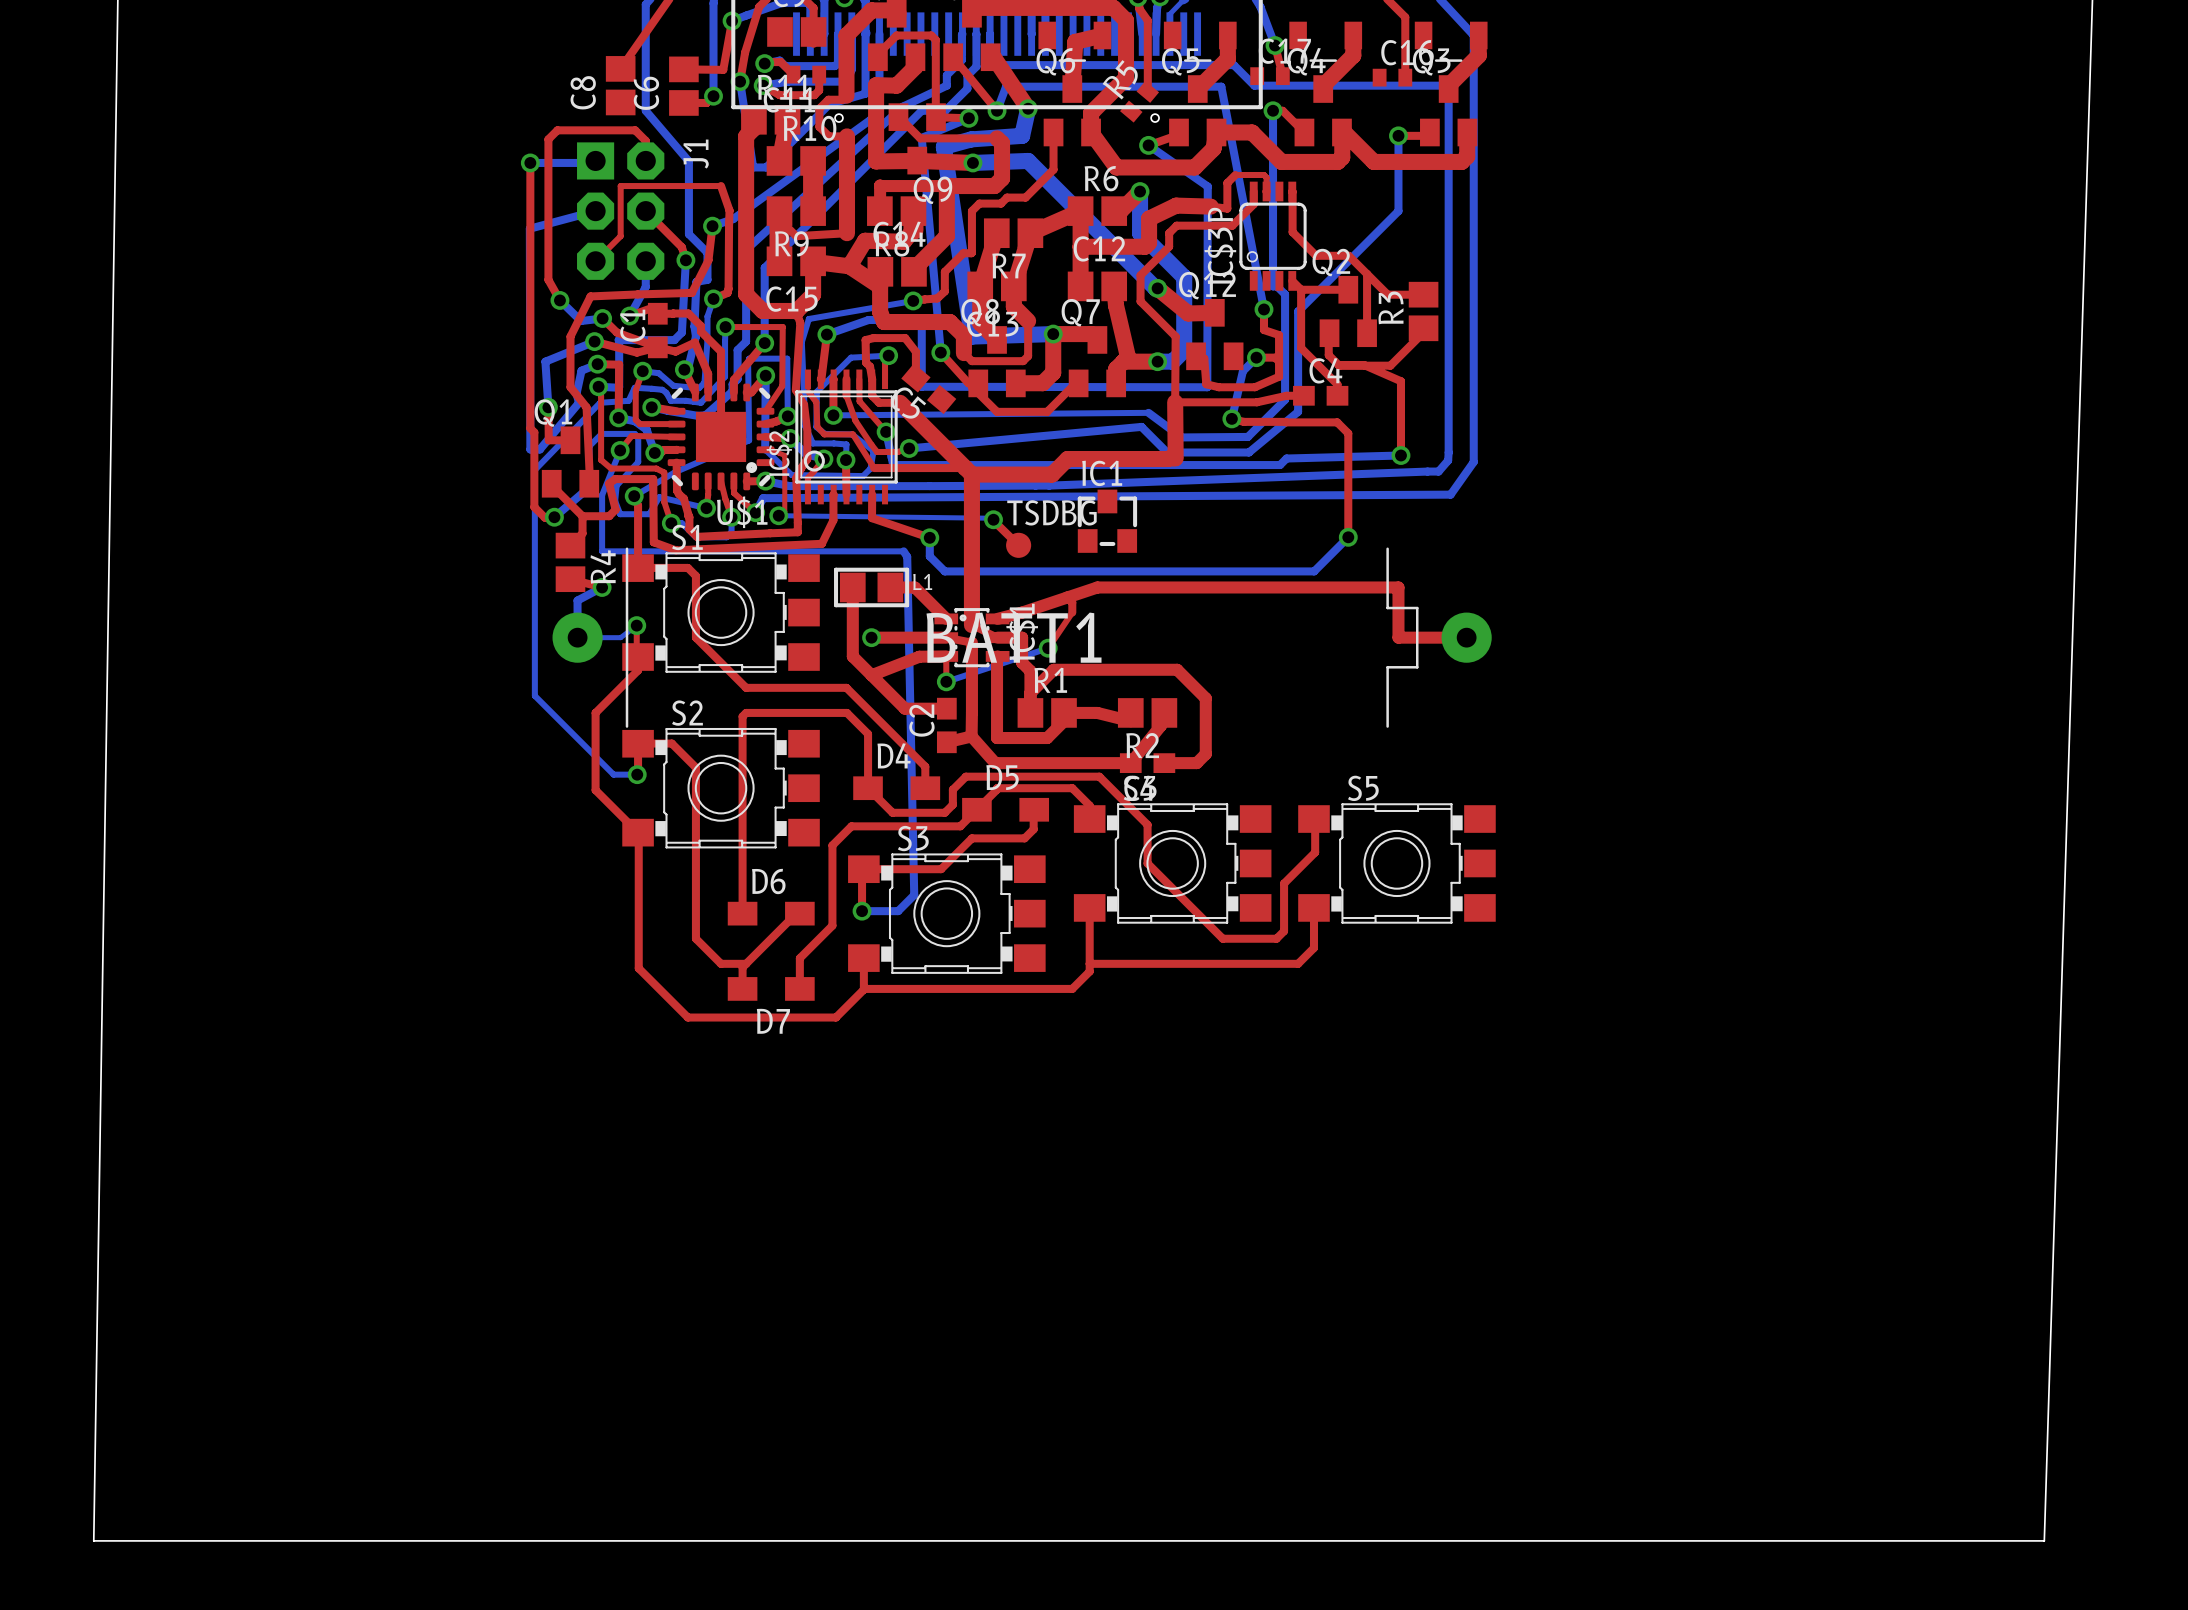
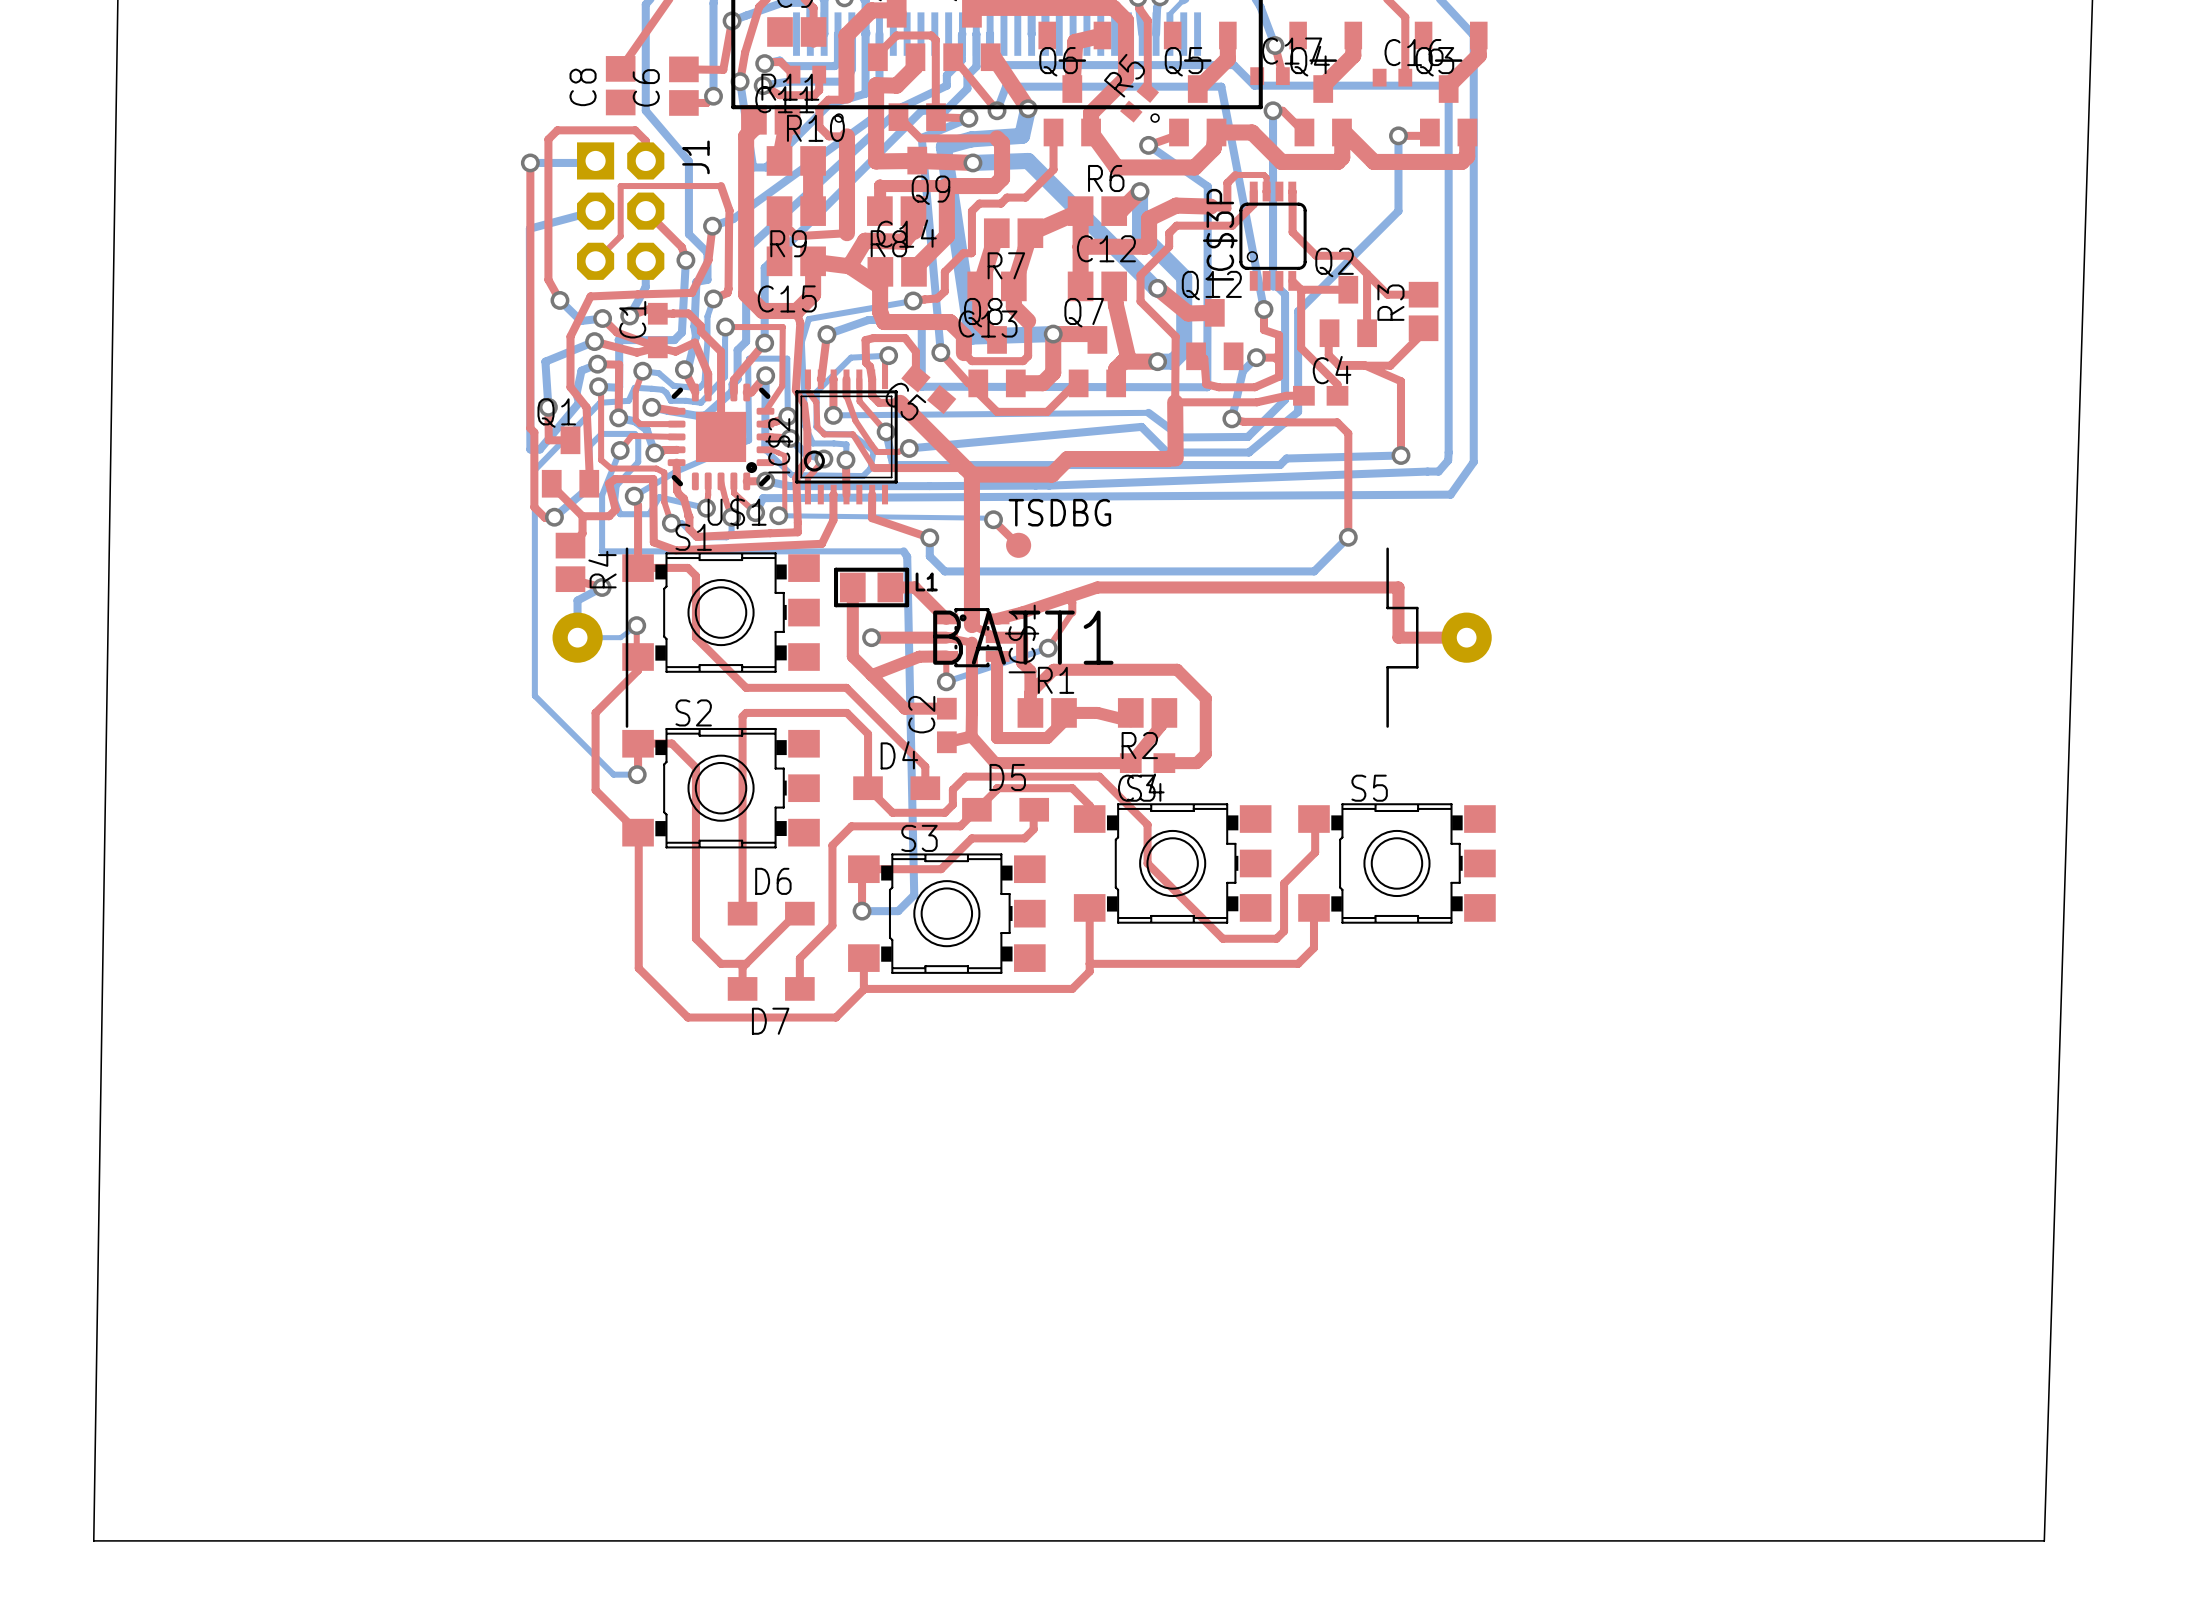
IC1: (1107, 521) -> none

